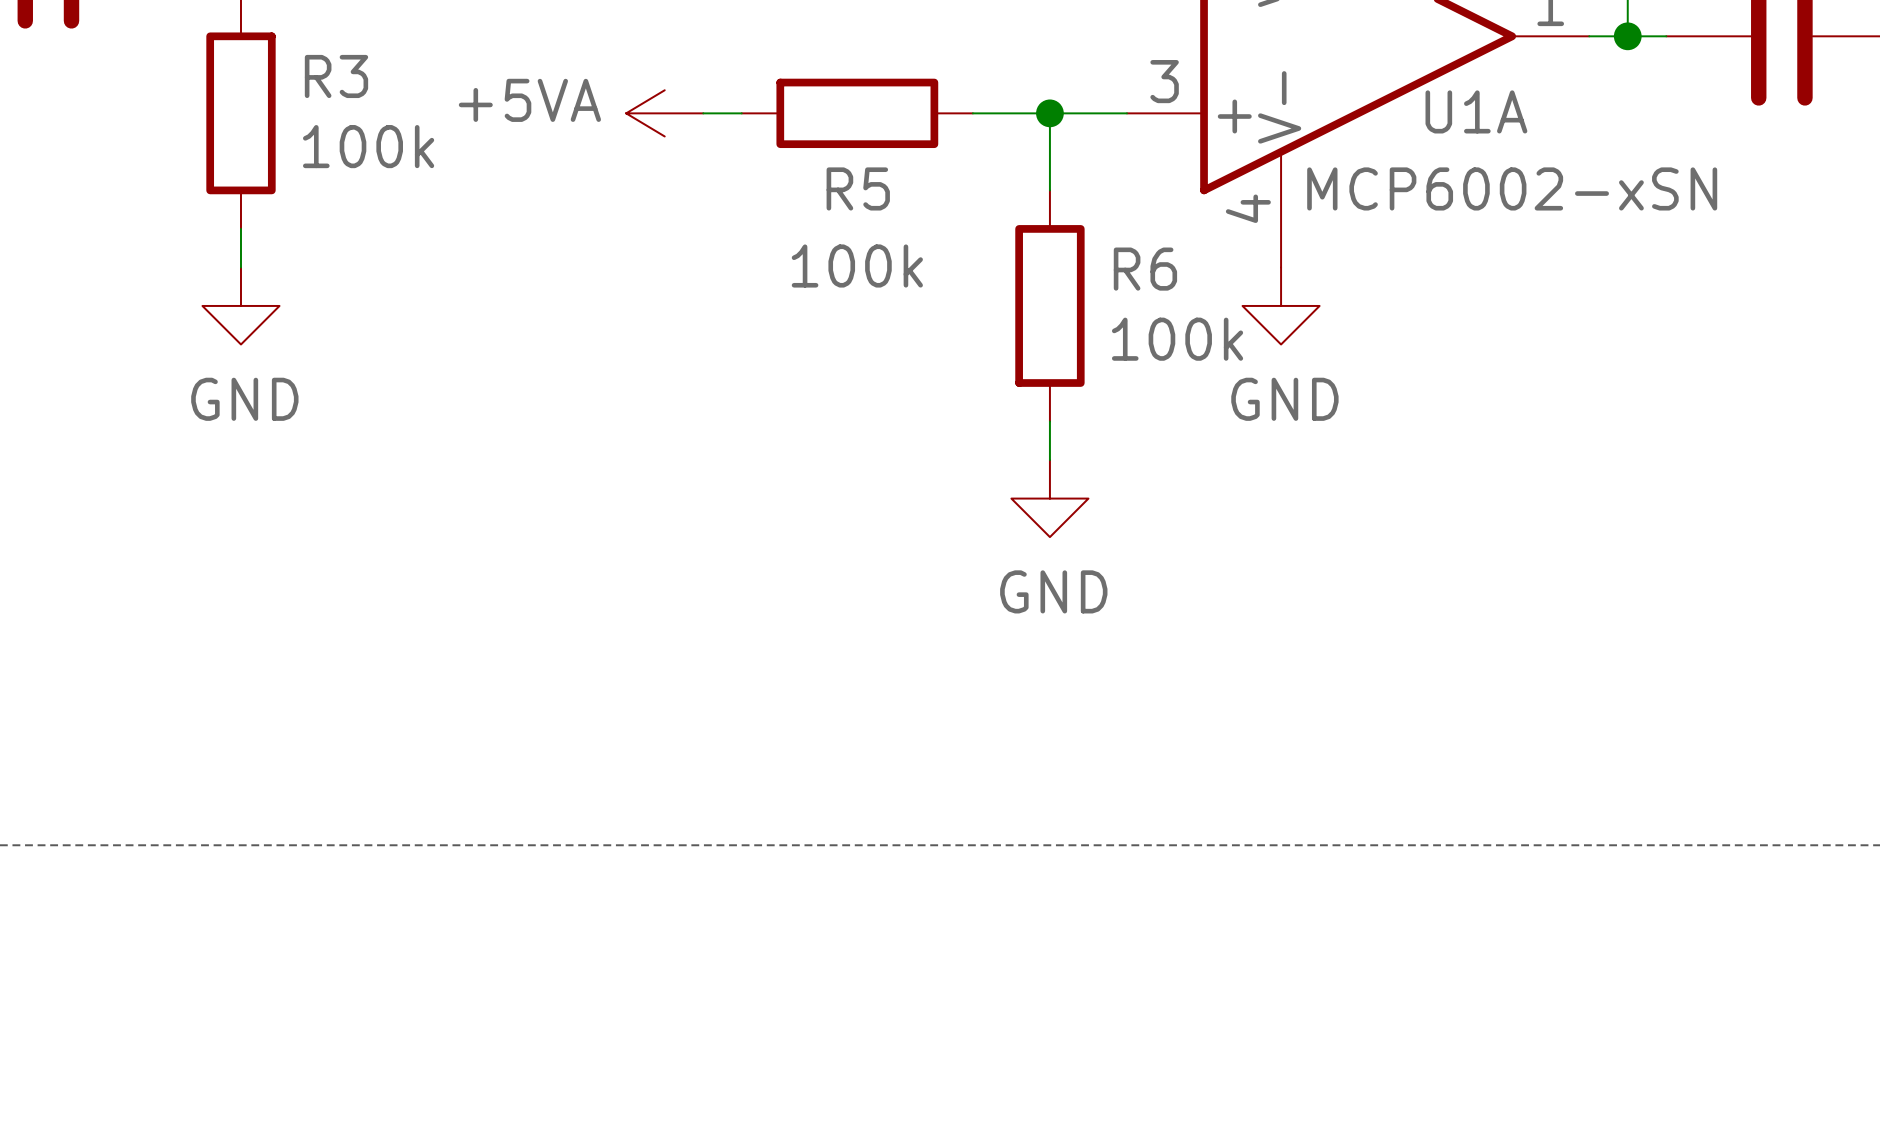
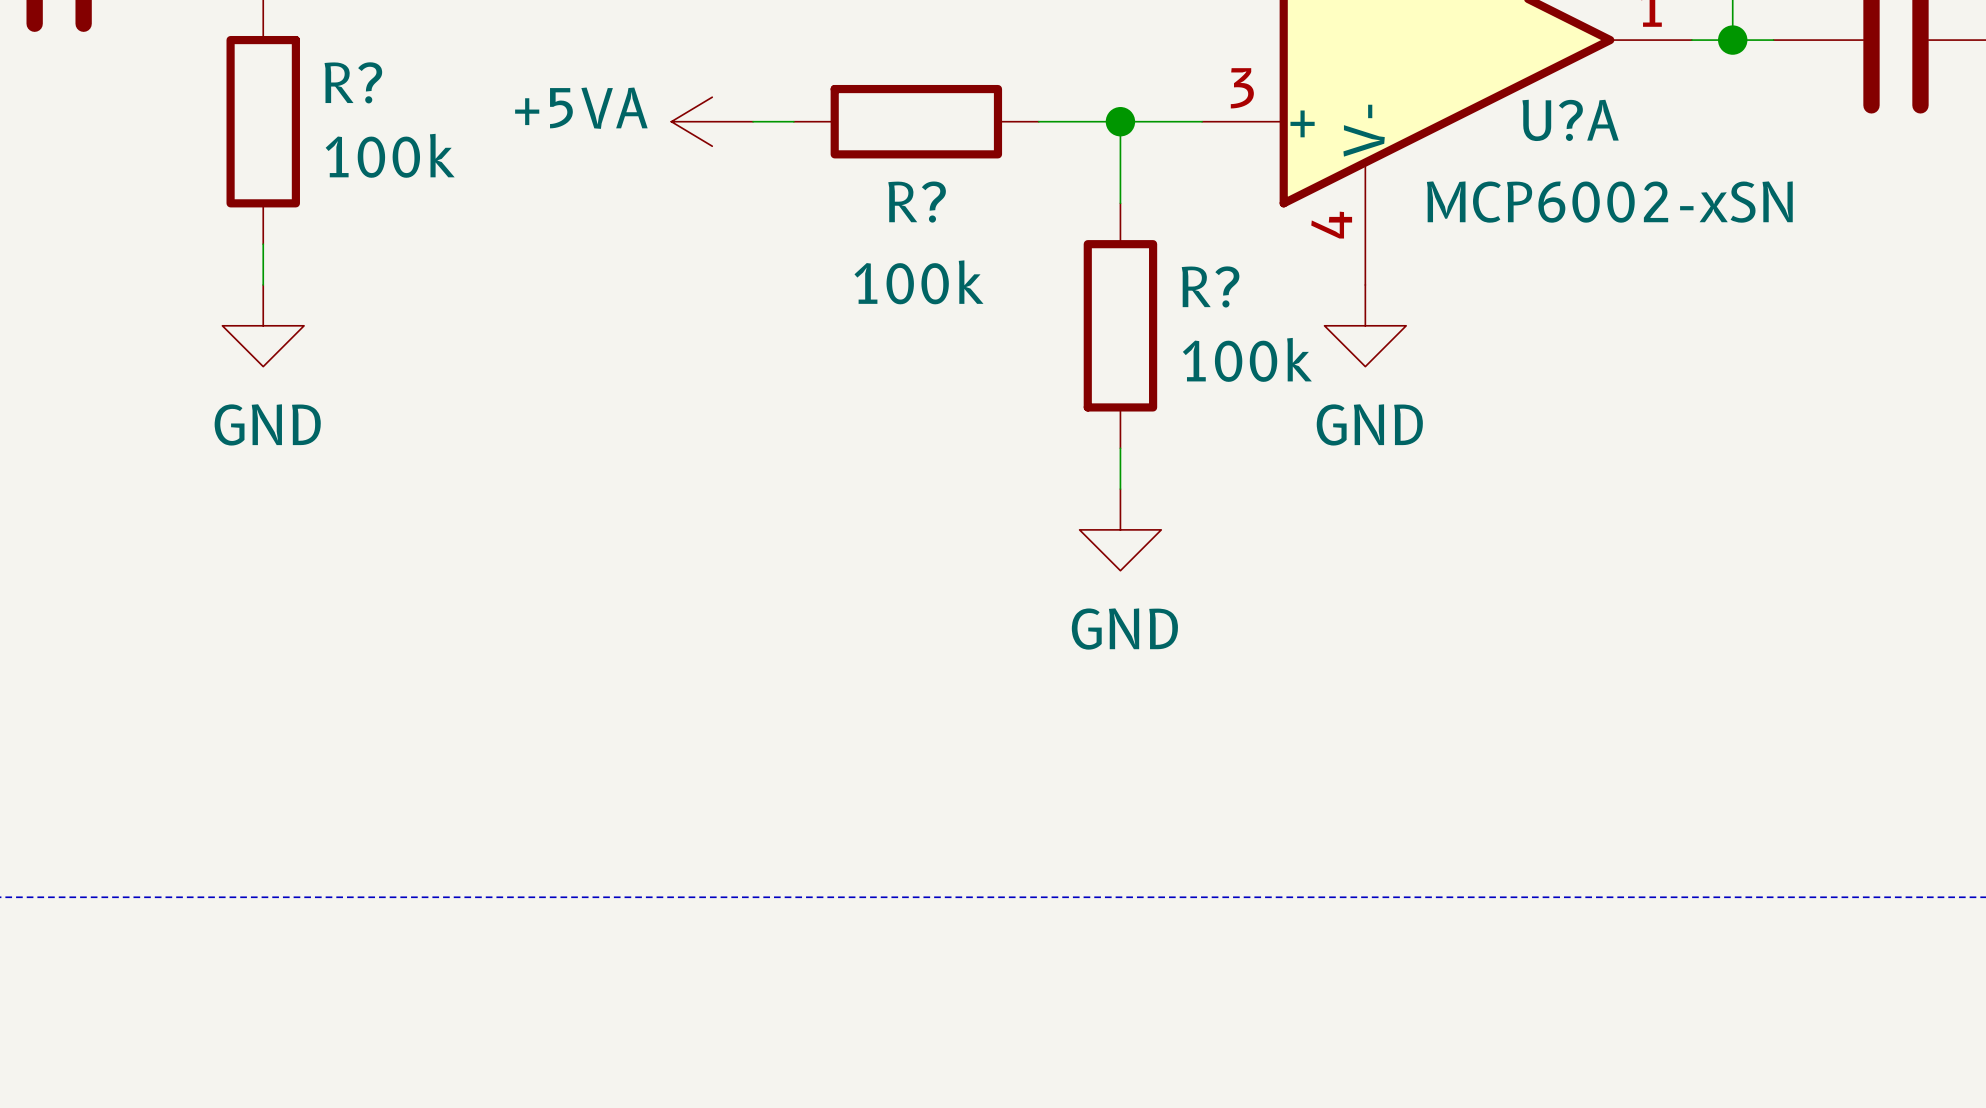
R3 name: R3 (336, 76) -> R? (353, 82)
U1A name: U1A (1476, 111) -> U?A (1570, 120)
R5 name: R5 (858, 188) -> R? (917, 202)
R6 name: R6 (1145, 269) -> R? (1210, 286)

